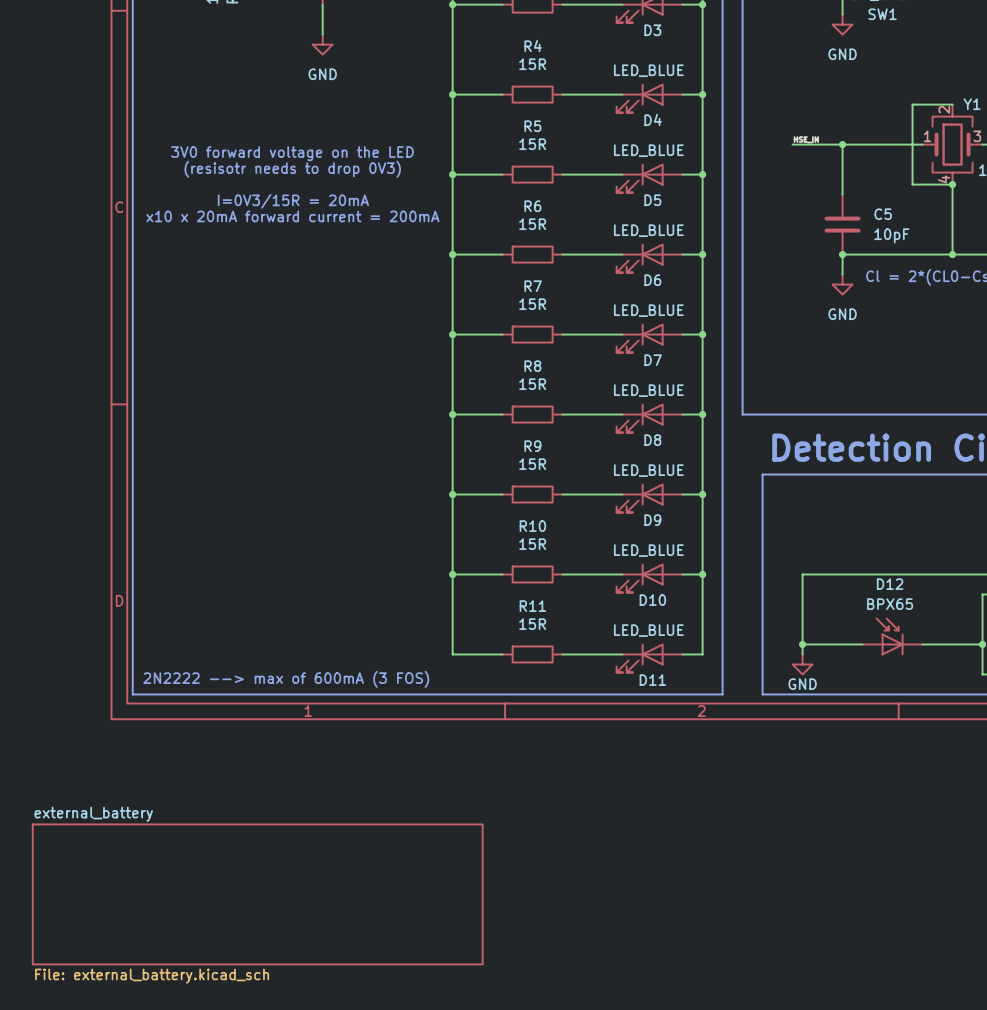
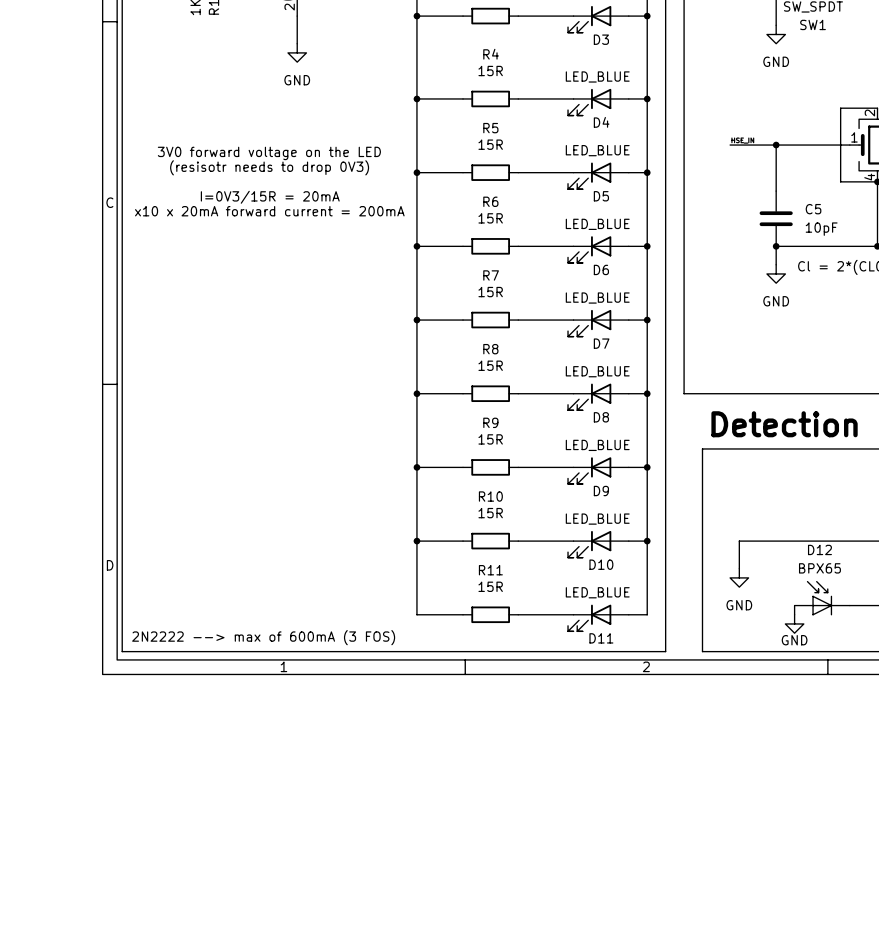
wire: (802, 604) (802, 654) -> none
power symbol: none -> GND (739, 577)
wire: (802, 644) (862, 644) -> (794, 614) (794, 605)
junction: (802, 644) -> none
power symbol: GND (802, 664) -> none
power symbol: none -> GND (794, 623)
sheet external_battery: File: external_battery.kicad_sch (257, 894) -> none

